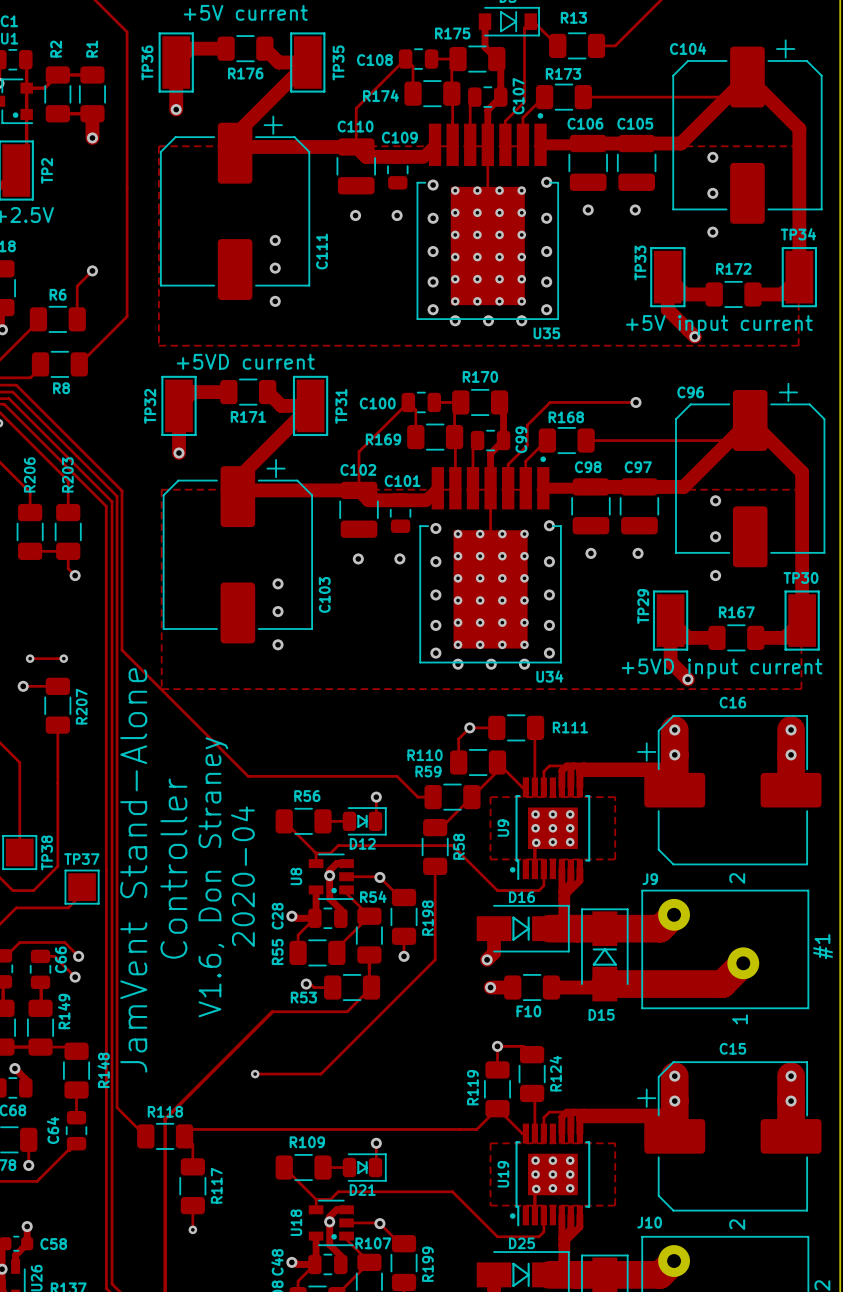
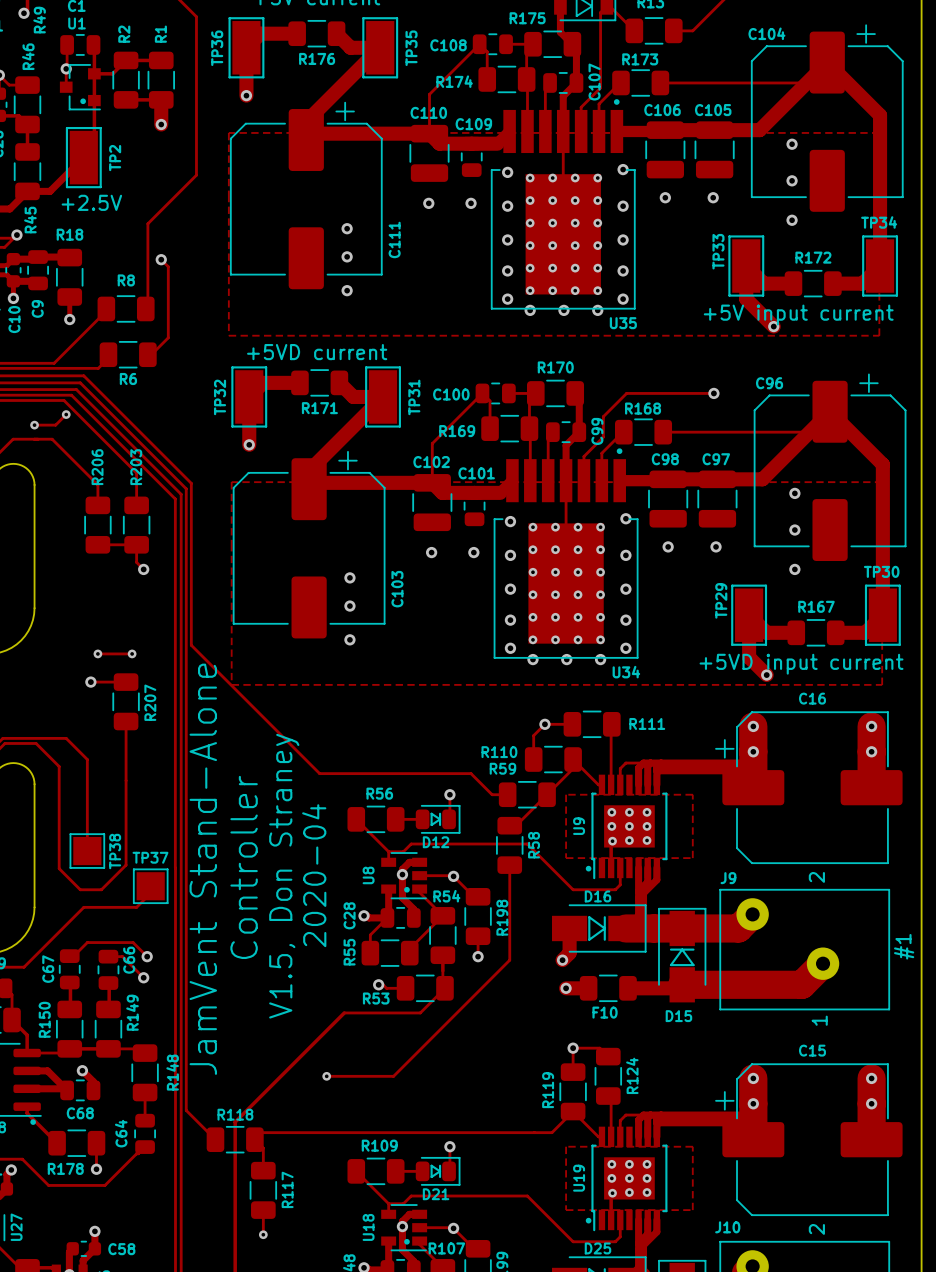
track: (127, 187) (127, 316) (79, 364) -> (196, 175) (147, 223) (147, 308)
track: (92, 270) (77, 286) (77, 319) -> (161, 259) (168, 266) (168, 337) (147, 358)
R6 name: R6 (58, 294) -> R8 (126, 280)
R8 name: R8 (61, 388) -> R6 (128, 378)
text: V1.6, Don Straney (213, 877) -> V1.5, Don Straney (284, 876)

